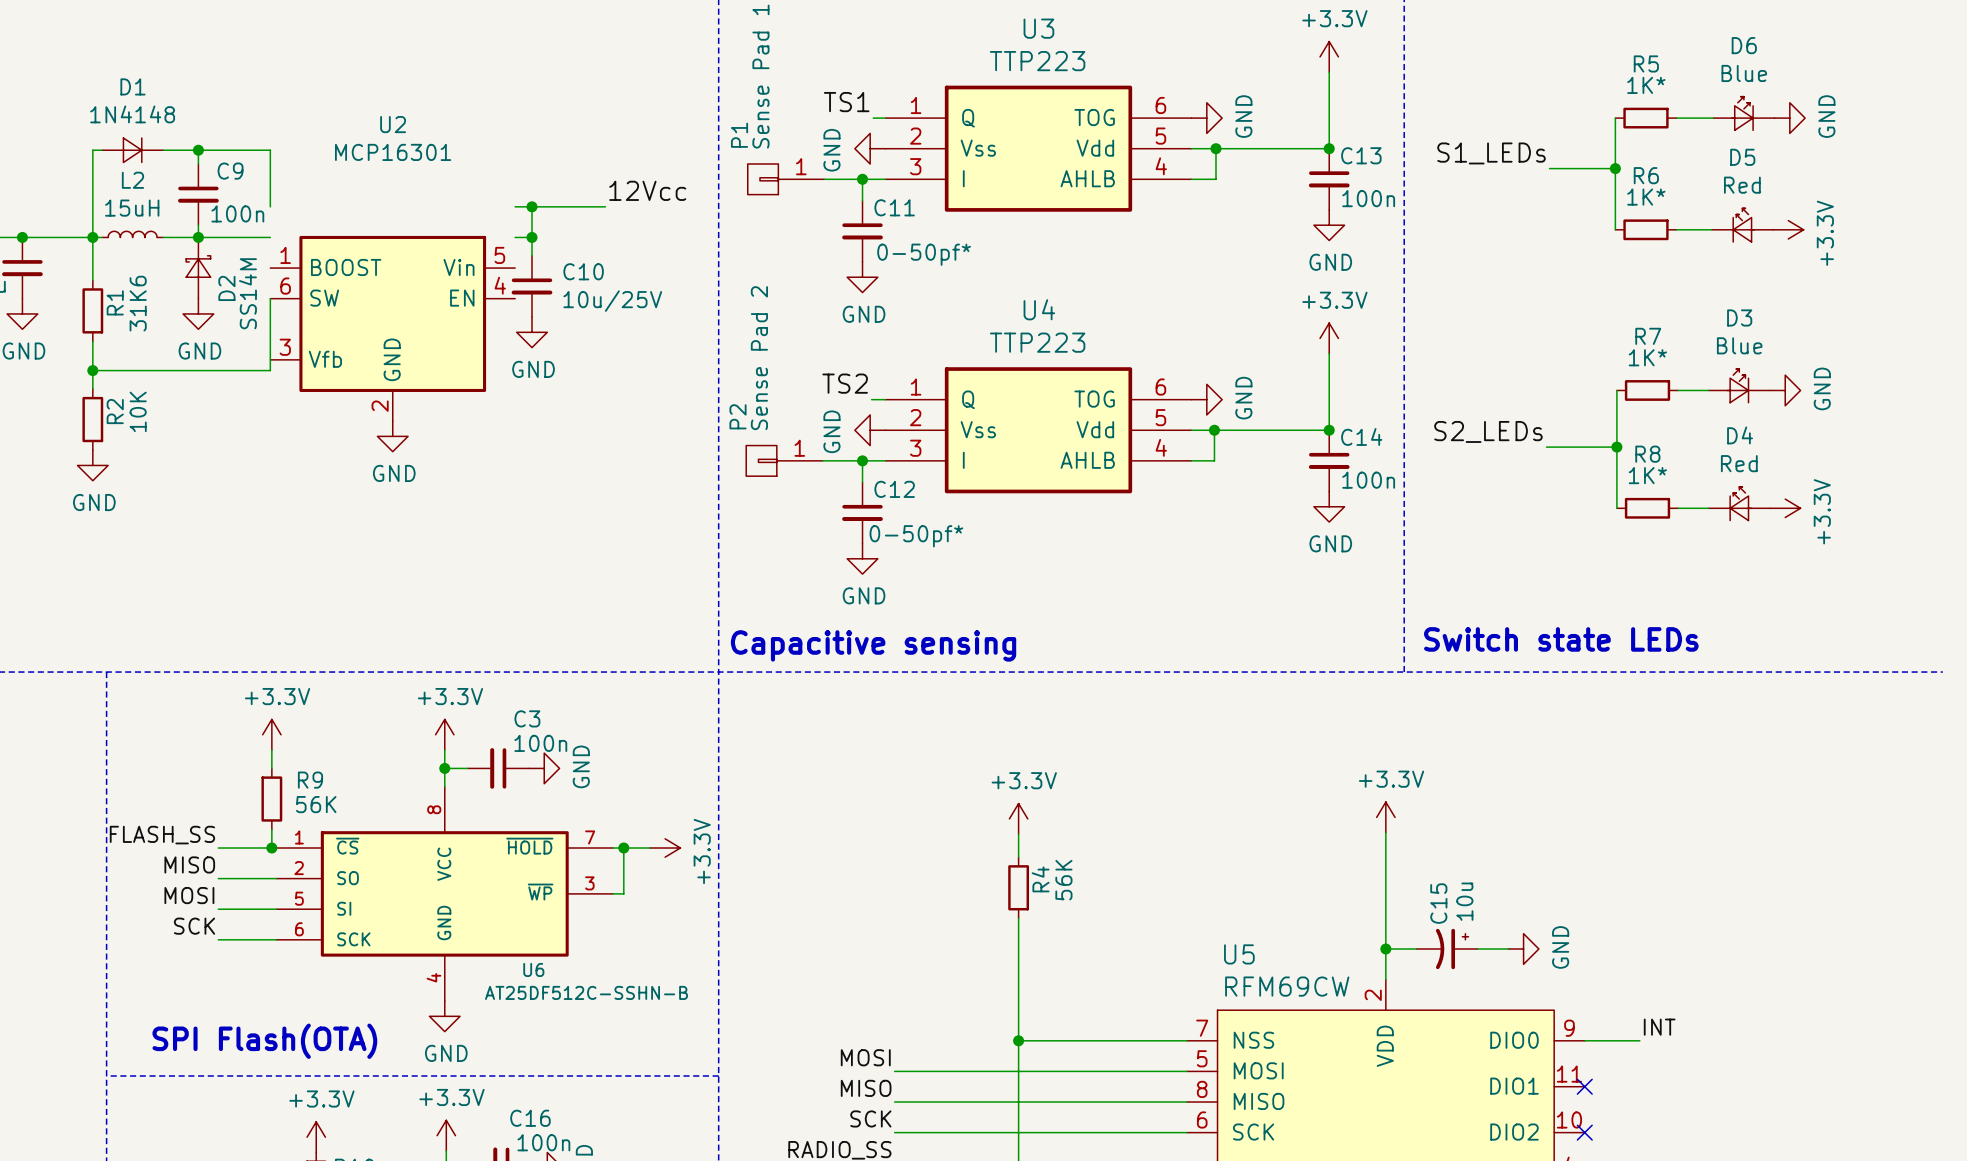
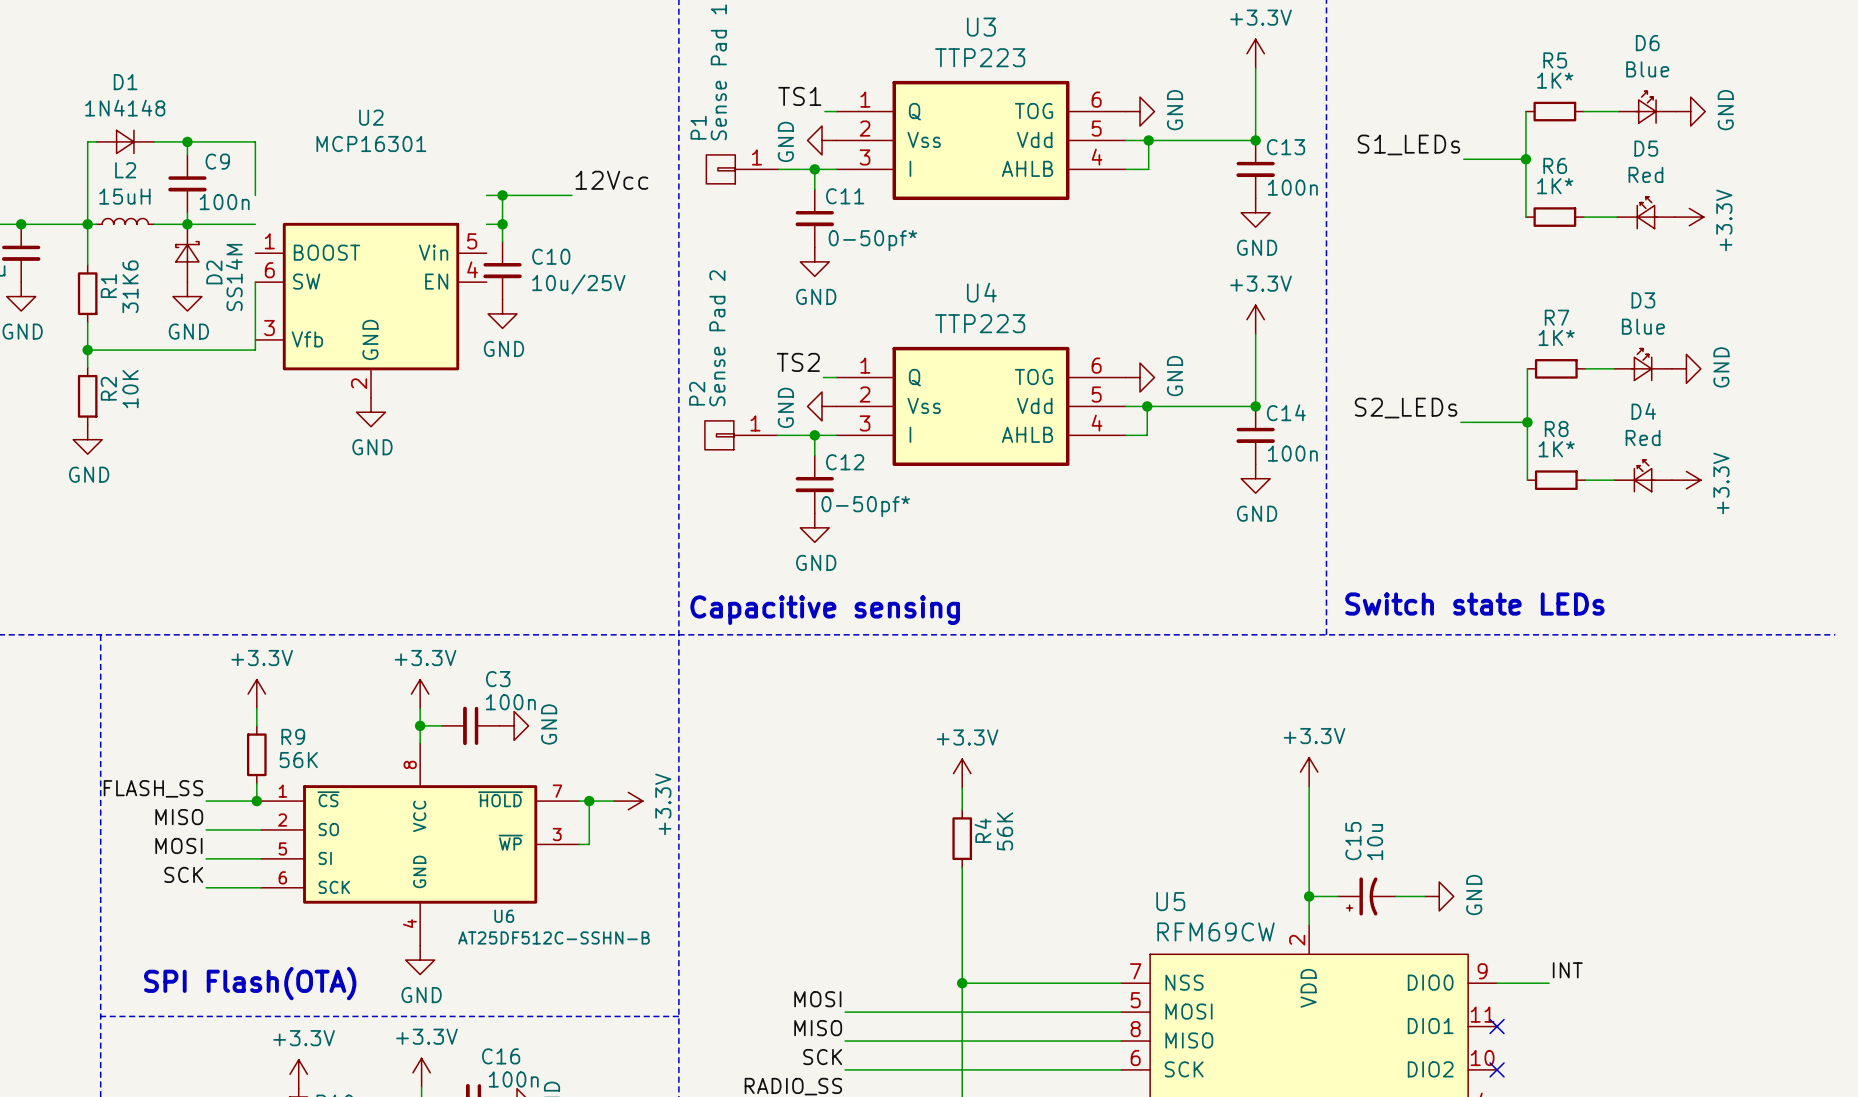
C15 rotation: 0° (1452, 948) -> 180° (1362, 896)

